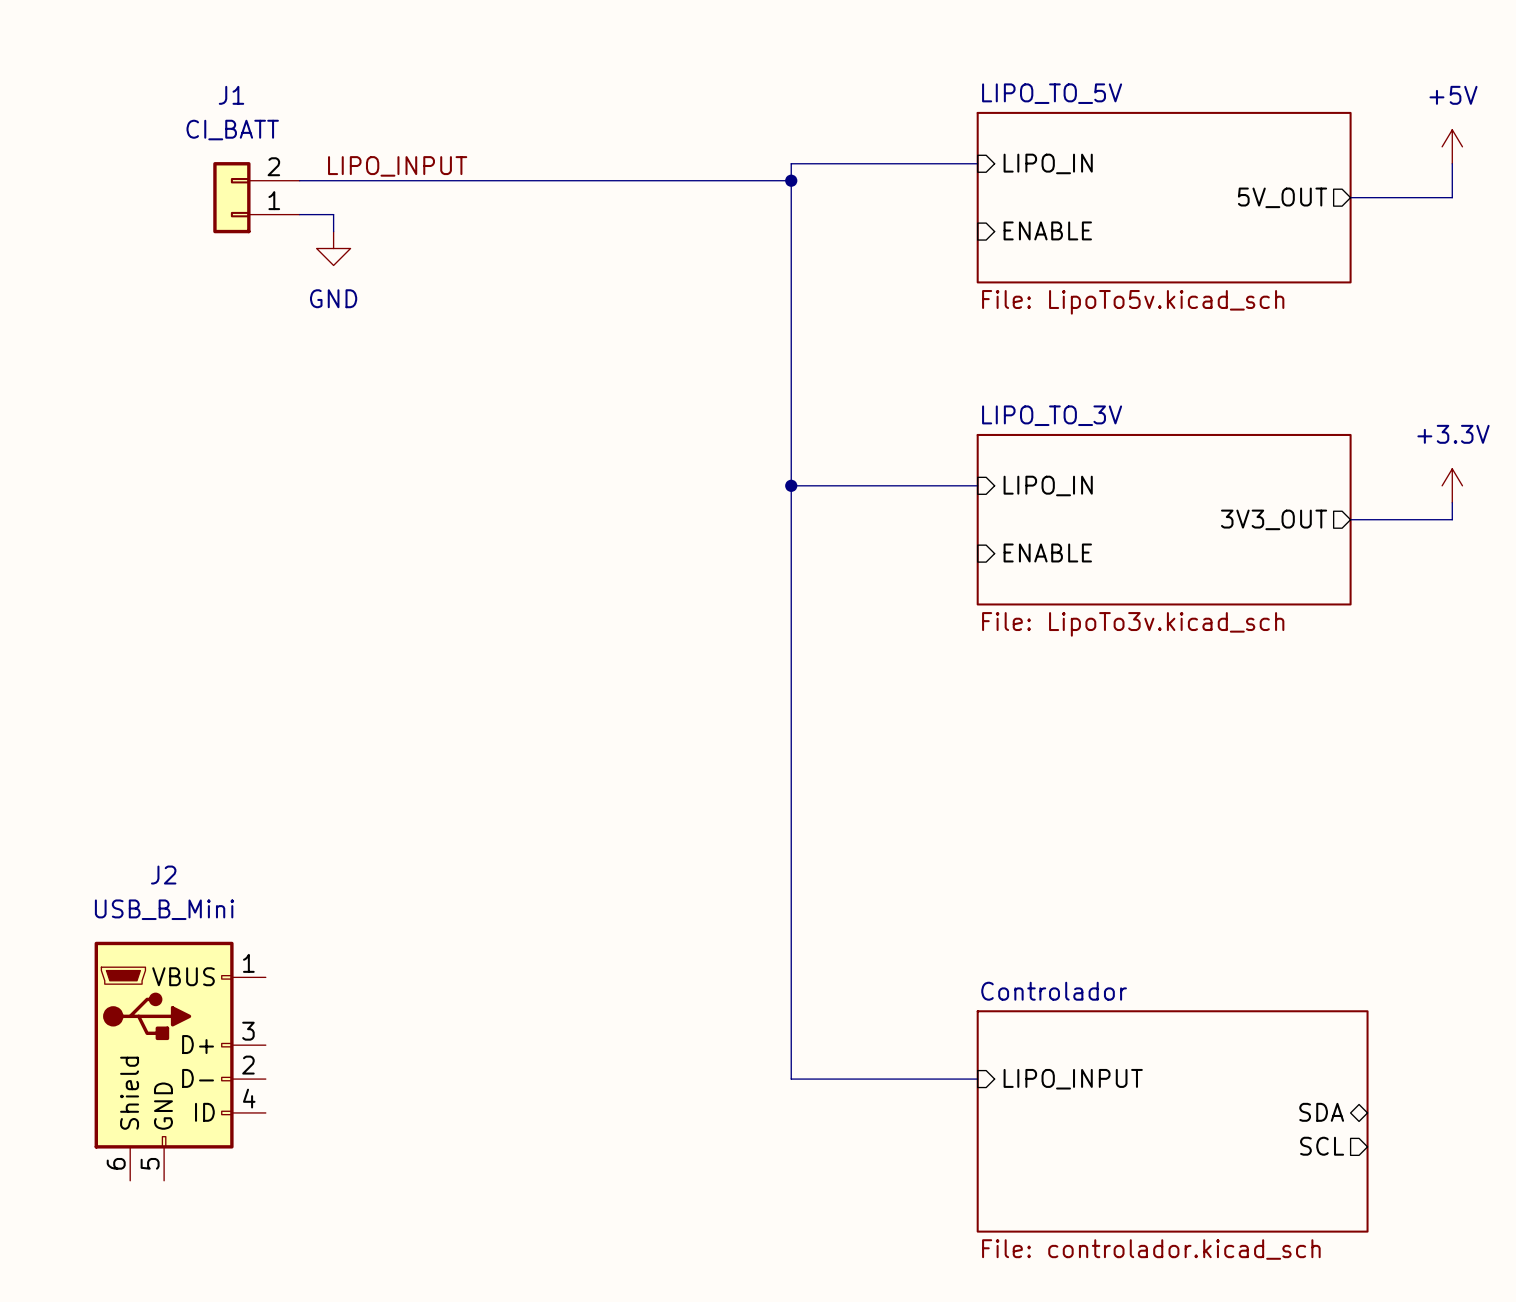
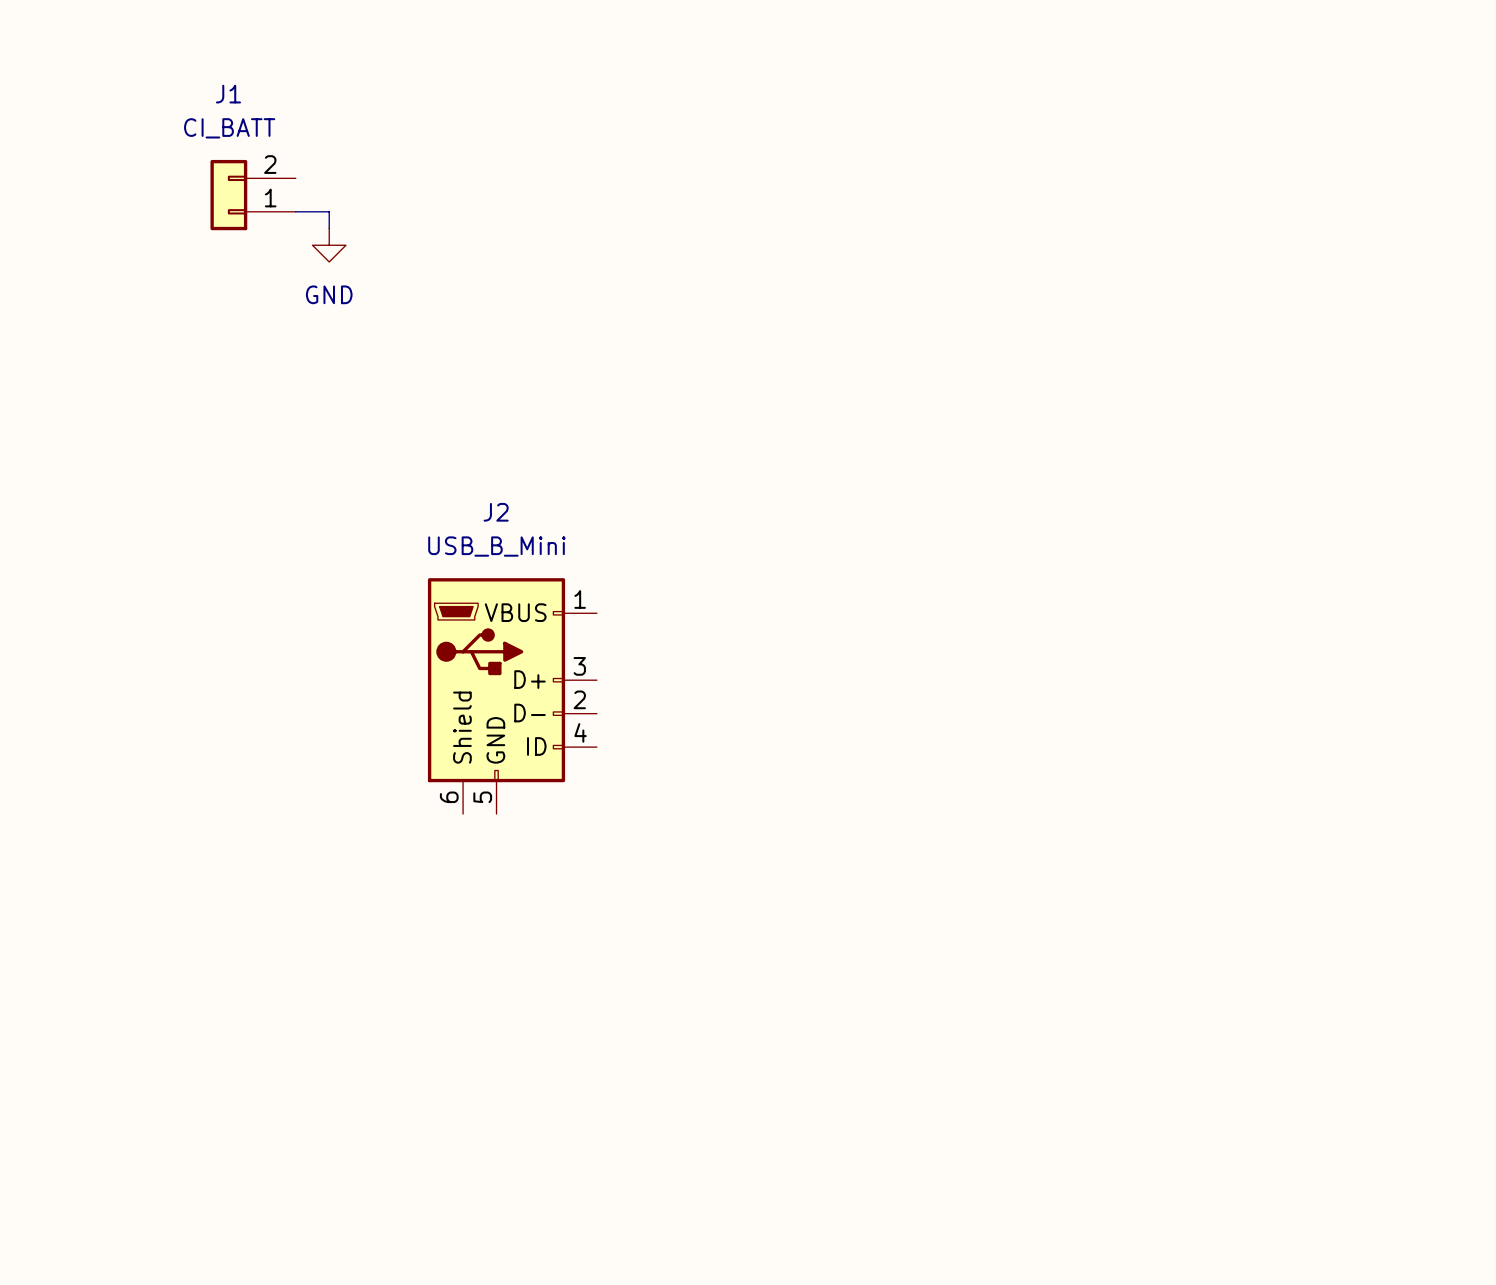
power symbol: +5V (1452, 146) -> none
wire: (977, 163) (791, 163) (791, 1079) (977, 1079) -> none
sheet pin: LIPO_IN (1048, 163) -> none
wire: (1452, 163) (1452, 197) (1350, 197) -> none
label: LIPO_INPUT (397, 166) -> none
wire: (299, 180) (791, 180) -> none
junction: (791, 180) -> none
sheet LIPO_TO_5V: File: LipoTo5v.kicad_sch (1164, 197) -> none
sheet pin: 5V_OUT (1282, 197) -> none
sheet pin: ENABLE (1047, 230) -> none
wire: (791, 485) (977, 485) -> none
junction: (791, 485) -> none
sheet pin: LIPO_IN (1048, 485) -> none
power symbol: +3.3V (1452, 485) -> none
wire: (1452, 502) (1452, 519) (1350, 519) -> none
sheet LIPO_TO_3V: File: LipoTo3v.kicad_sch (1164, 519) -> none
sheet pin: 3V3_OUT (1274, 519) -> none
sheet pin: ENABLE (1047, 552) -> none
J2 position: (180, 1061) -> (512, 696)
sheet pin: LIPO_INPUT (1073, 1079) -> none
sheet pin: SDA (1321, 1112) -> none
sheet Controlador: File: controlador.kicad_sch (1172, 1121) -> none
sheet pin: SCL (1322, 1146) -> none

